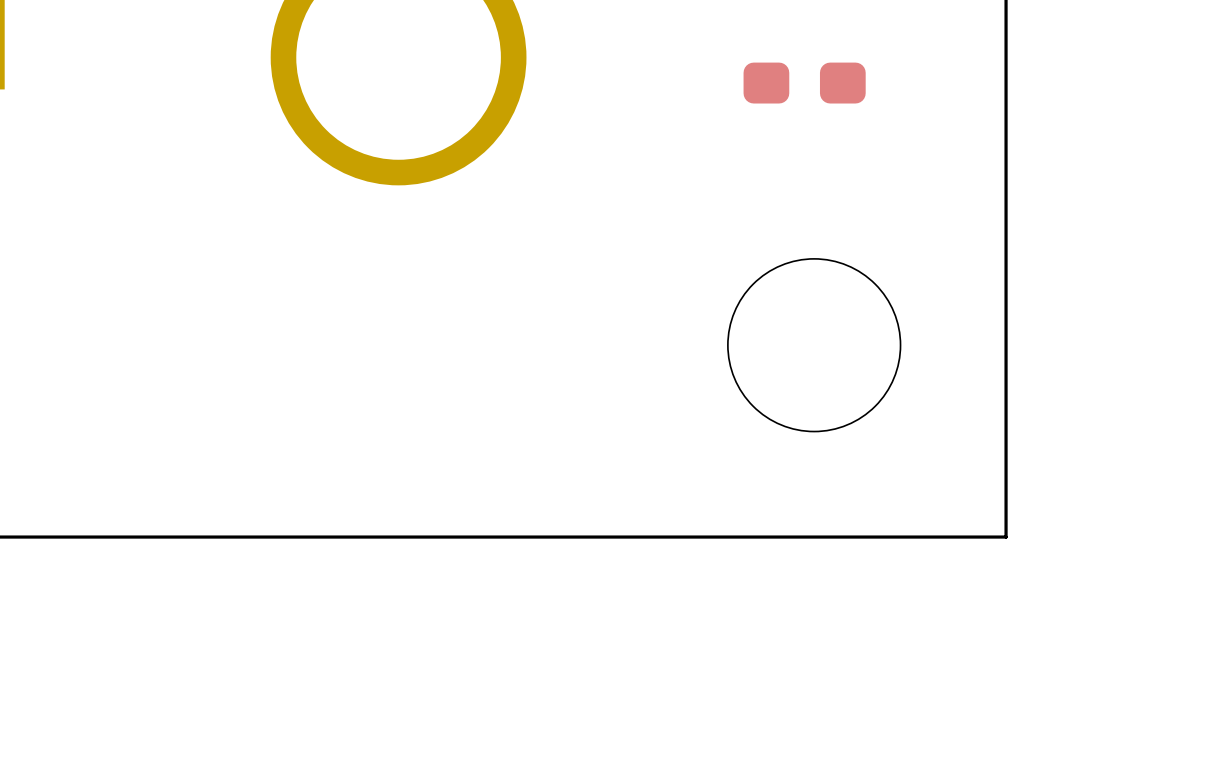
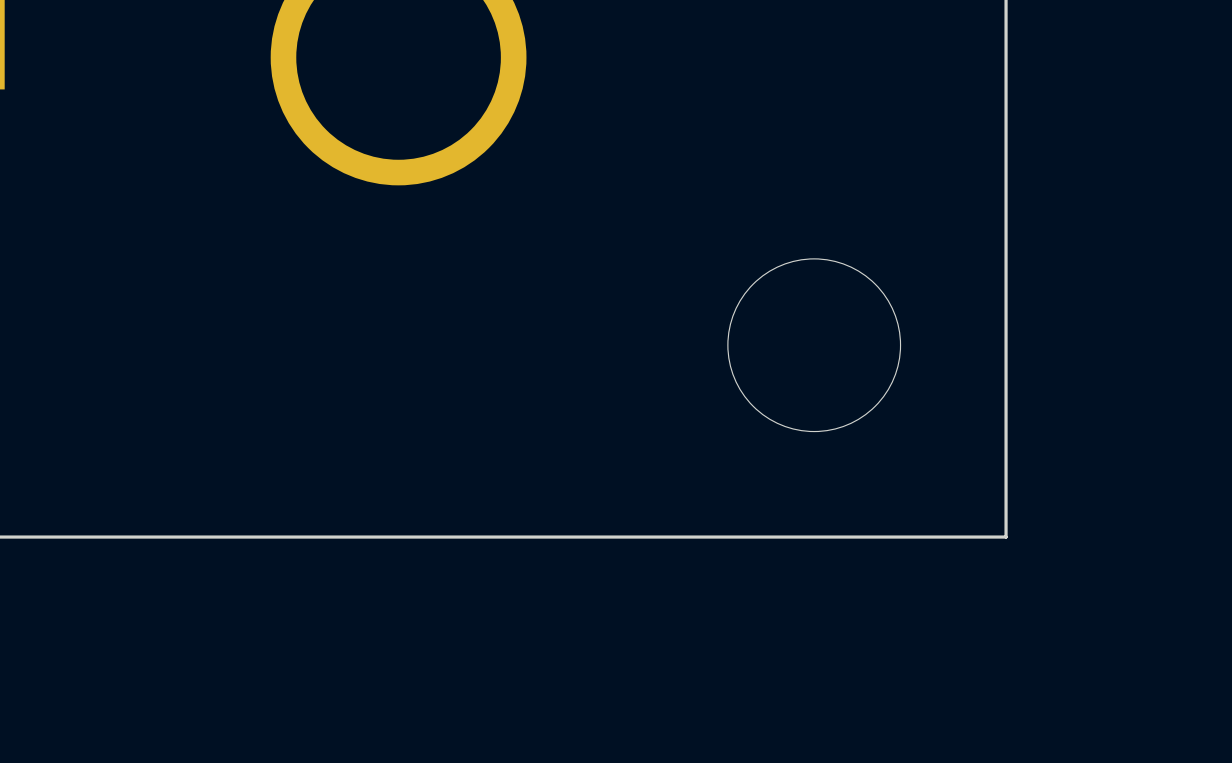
part: (804, 83) -> none

